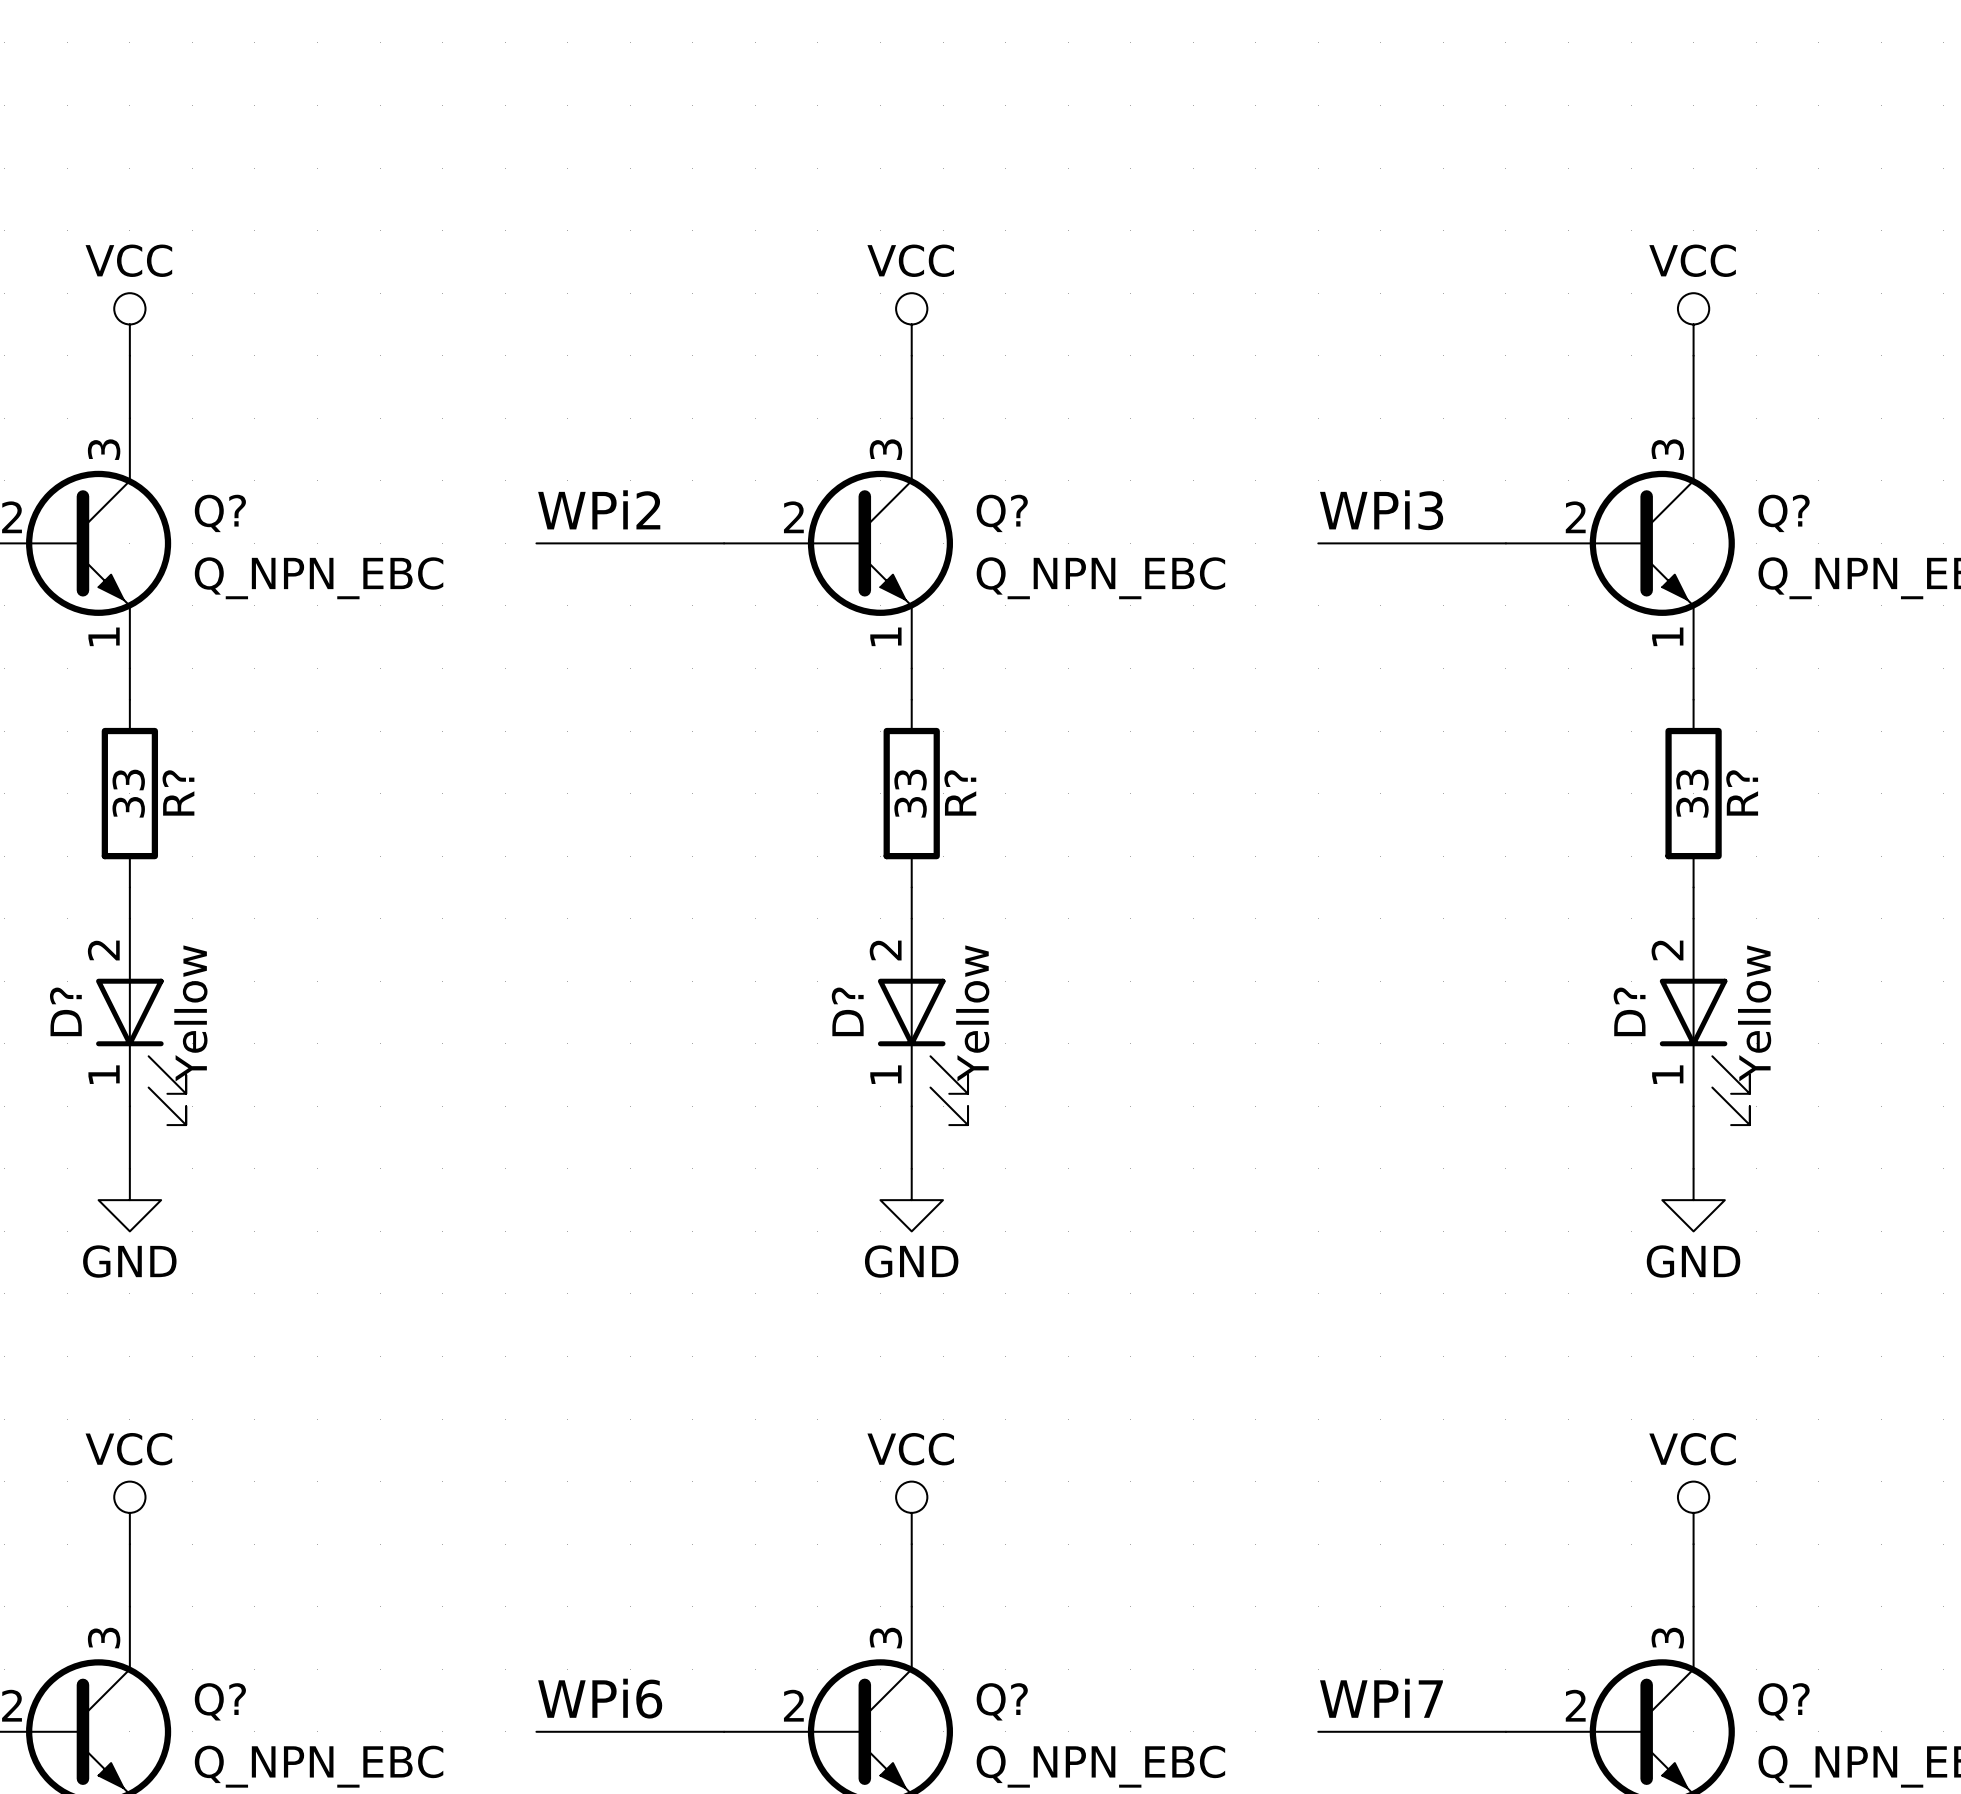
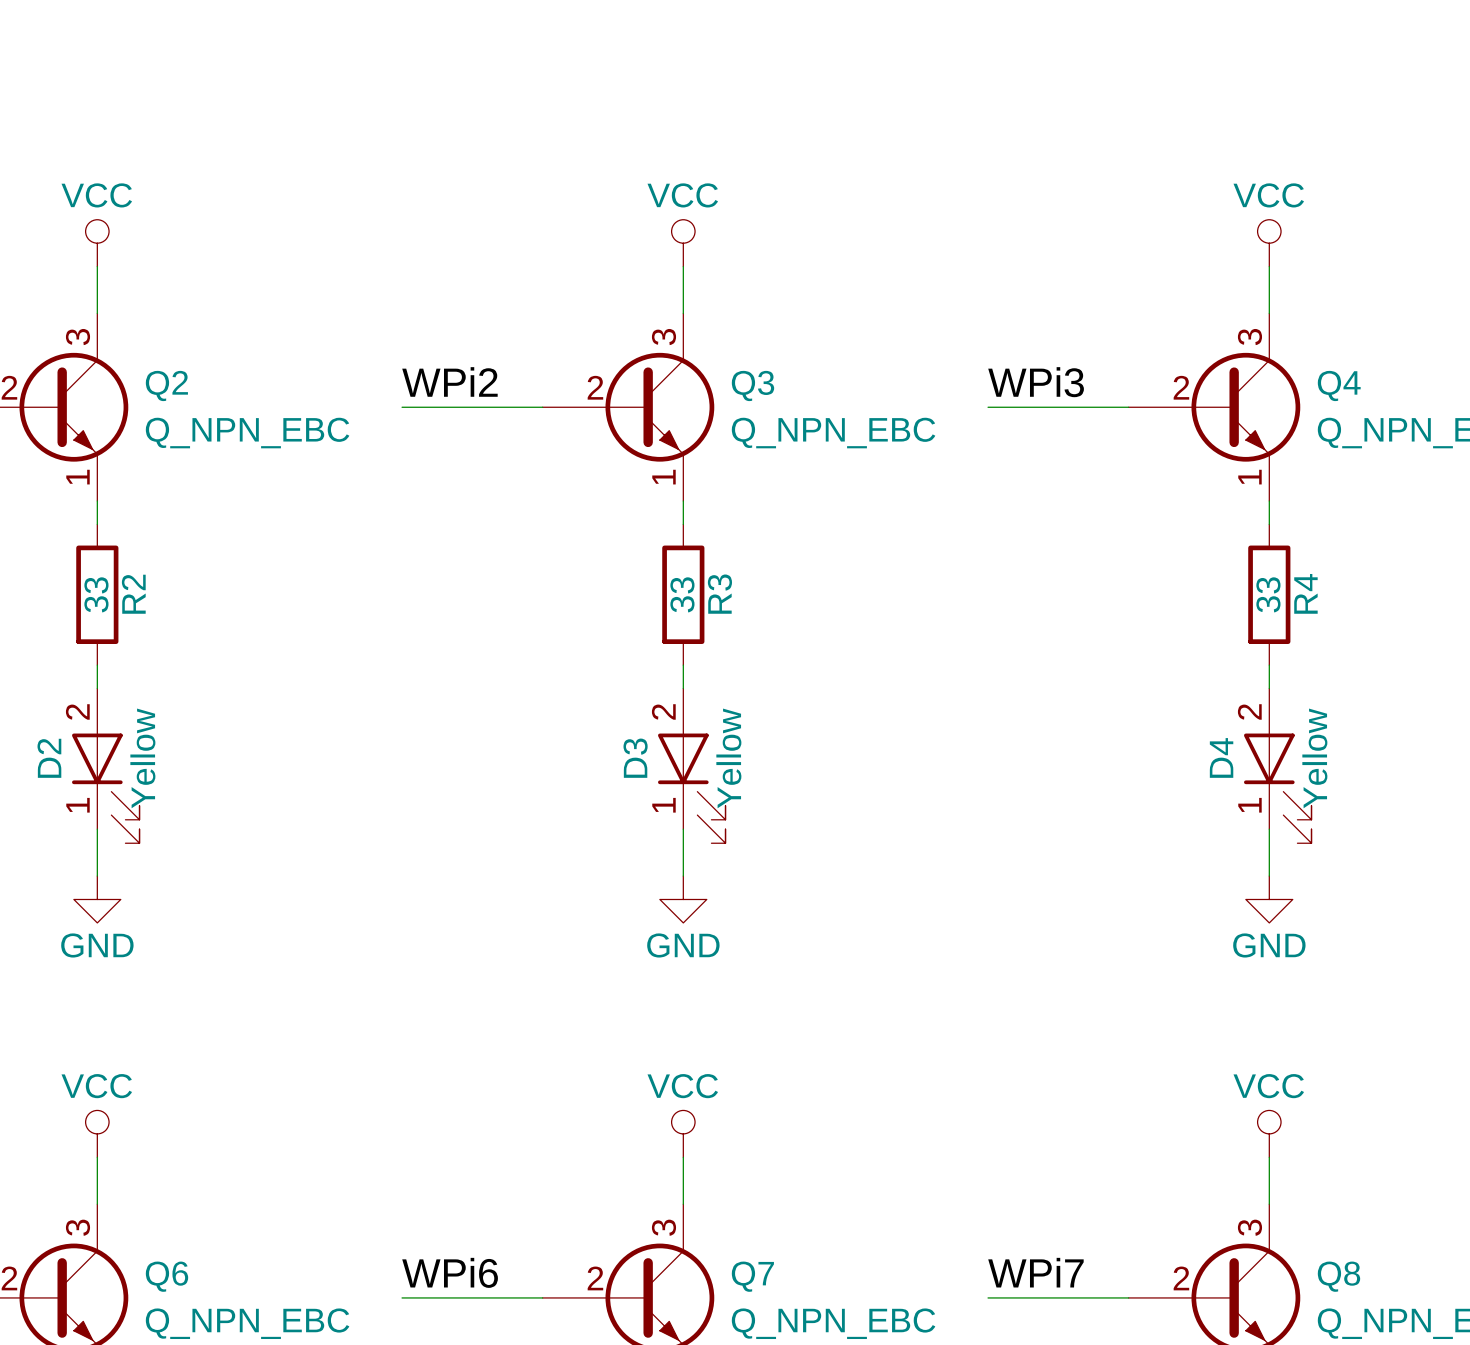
Q? name: Q? (220, 513) -> Q2 (166, 385)
Q? name: Q? (1002, 513) -> Q3 (752, 385)
Q? name: Q? (1784, 513) -> Q4 (1339, 385)
R? name: R? (178, 792) -> R2 (133, 594)
R? name: R? (960, 792) -> R3 (719, 594)
R? name: R? (1742, 792) -> R4 (1305, 593)
D? name: D? (65, 1011) -> D2 (49, 758)
D? name: D? (847, 1011) -> D3 (635, 758)
D? name: D? (1629, 1011) -> D4 (1221, 757)
Q? name: Q? (220, 1701) -> Q6 (167, 1276)
Q? name: Q? (1002, 1701) -> Q7 (752, 1276)
Q? name: Q? (1784, 1701) -> Q8 (1338, 1276)

